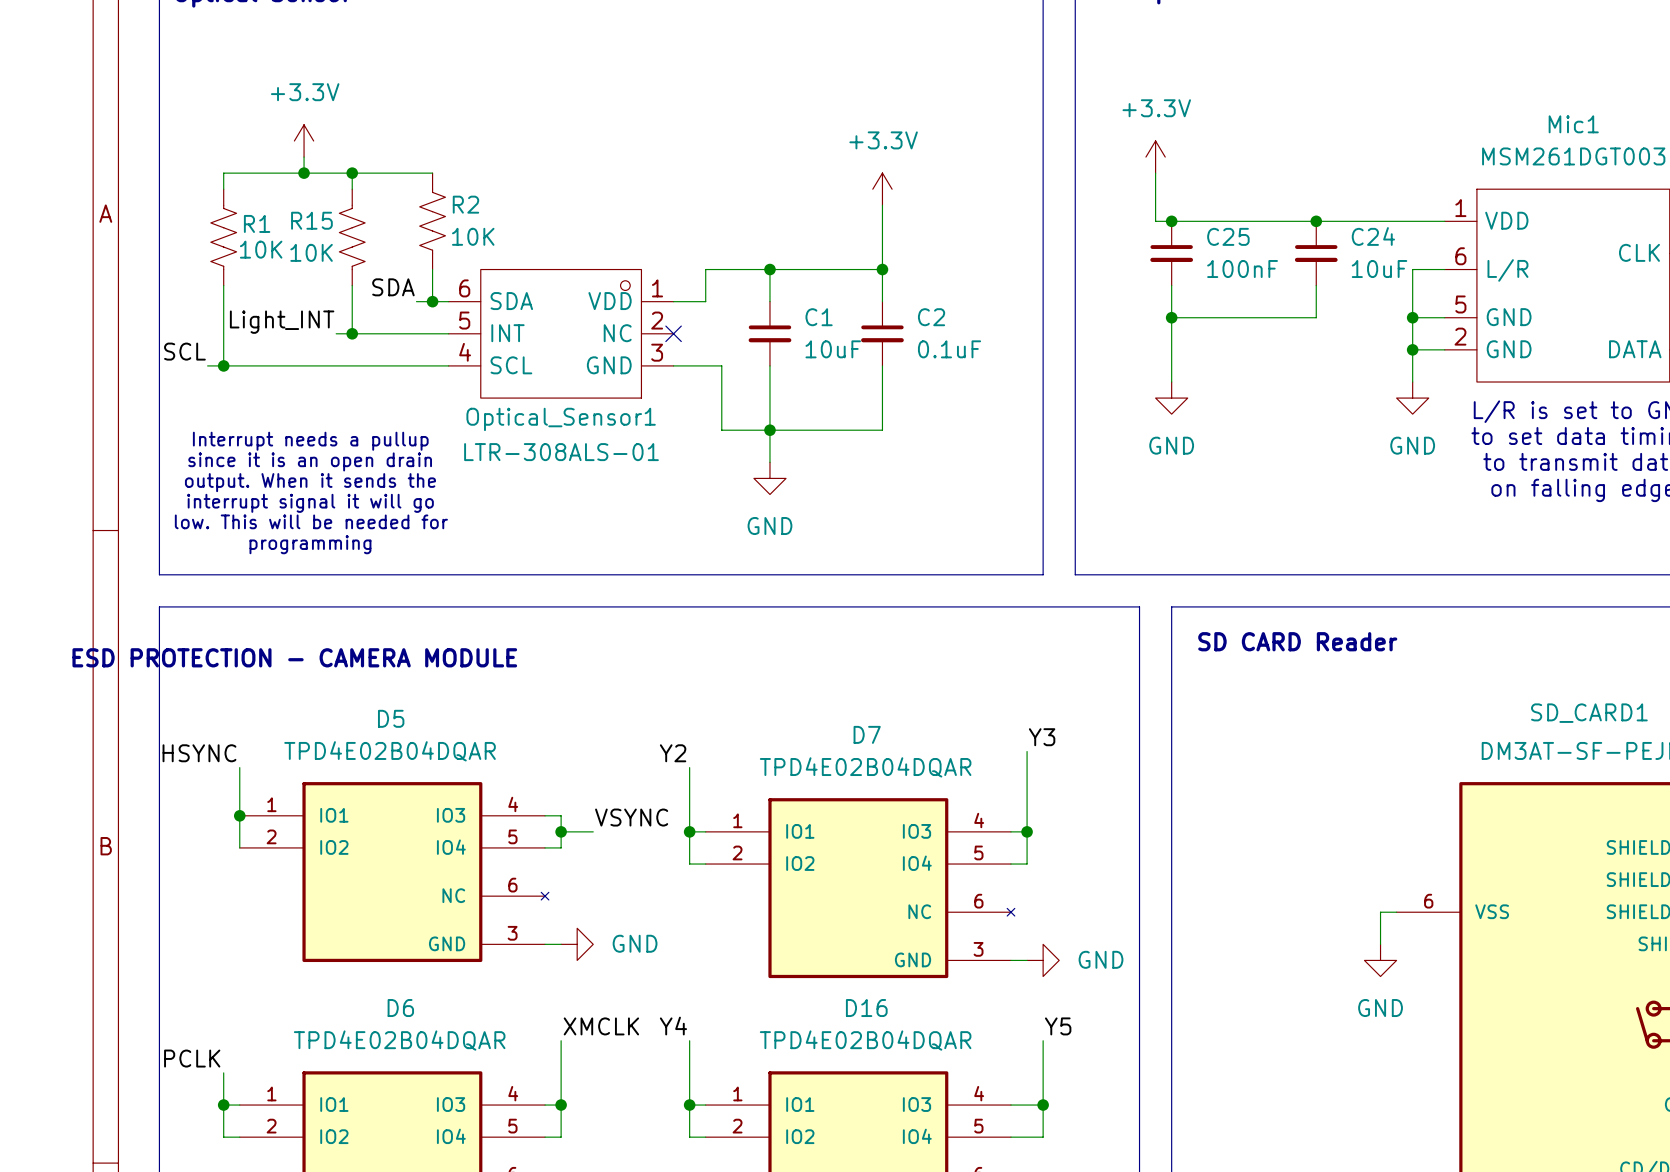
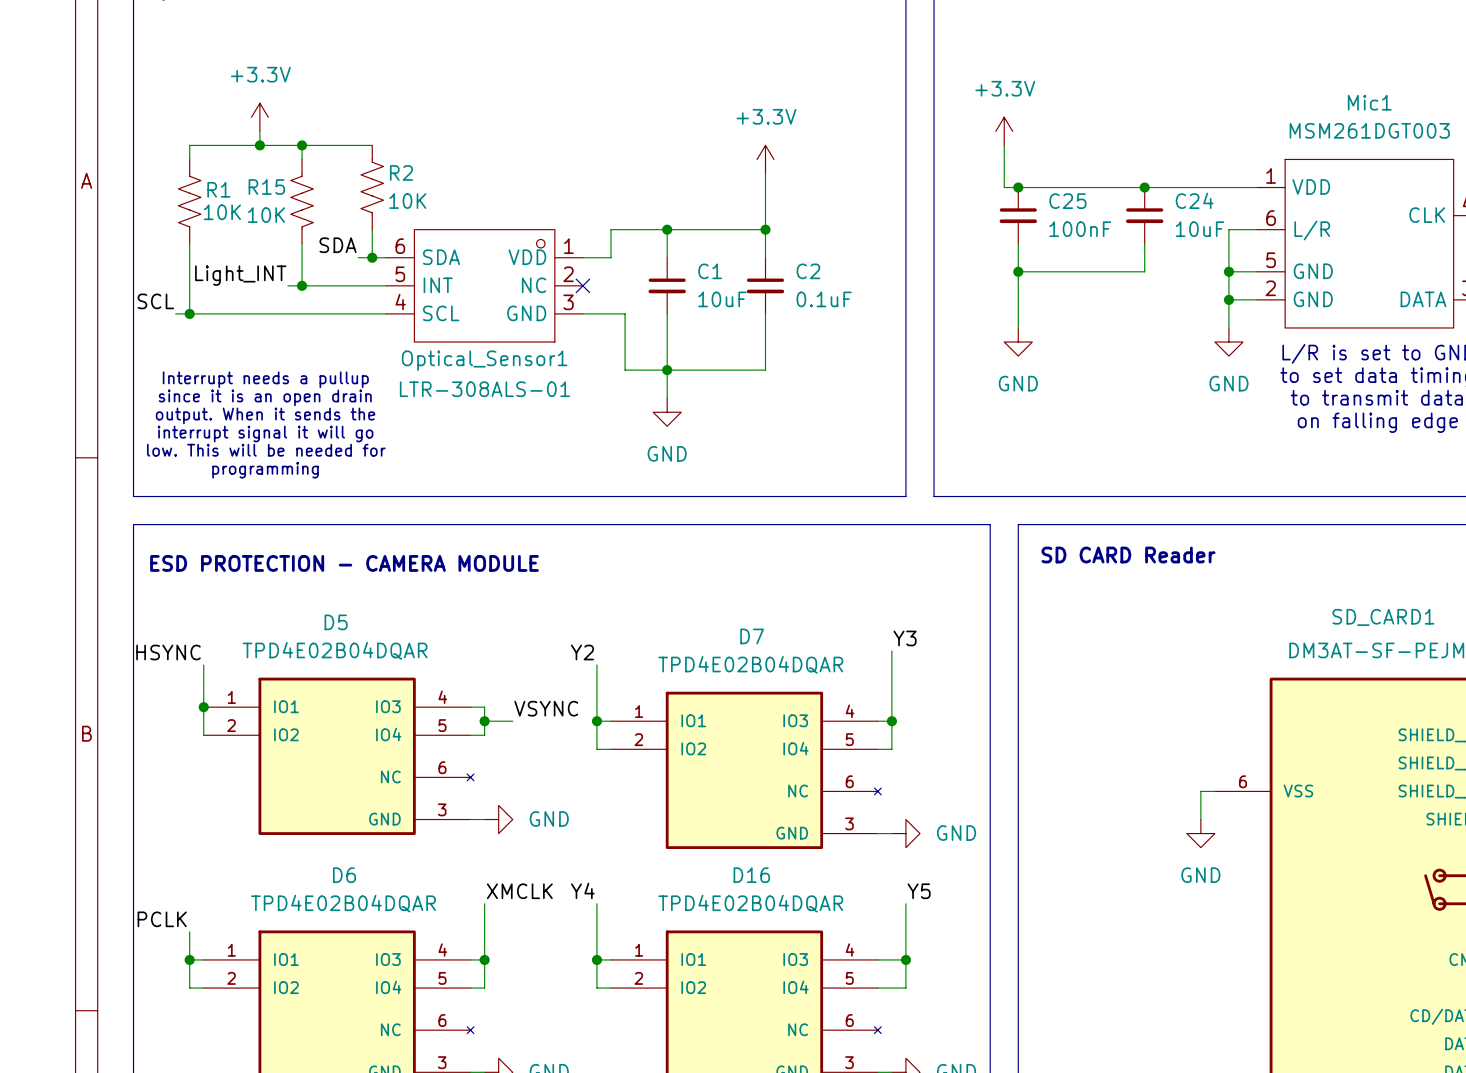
text position: ESD PROTECTION - CAMERA MODULE (294, 657) -> ESD PROTECTION - CAMERA MODULE (344, 563)

